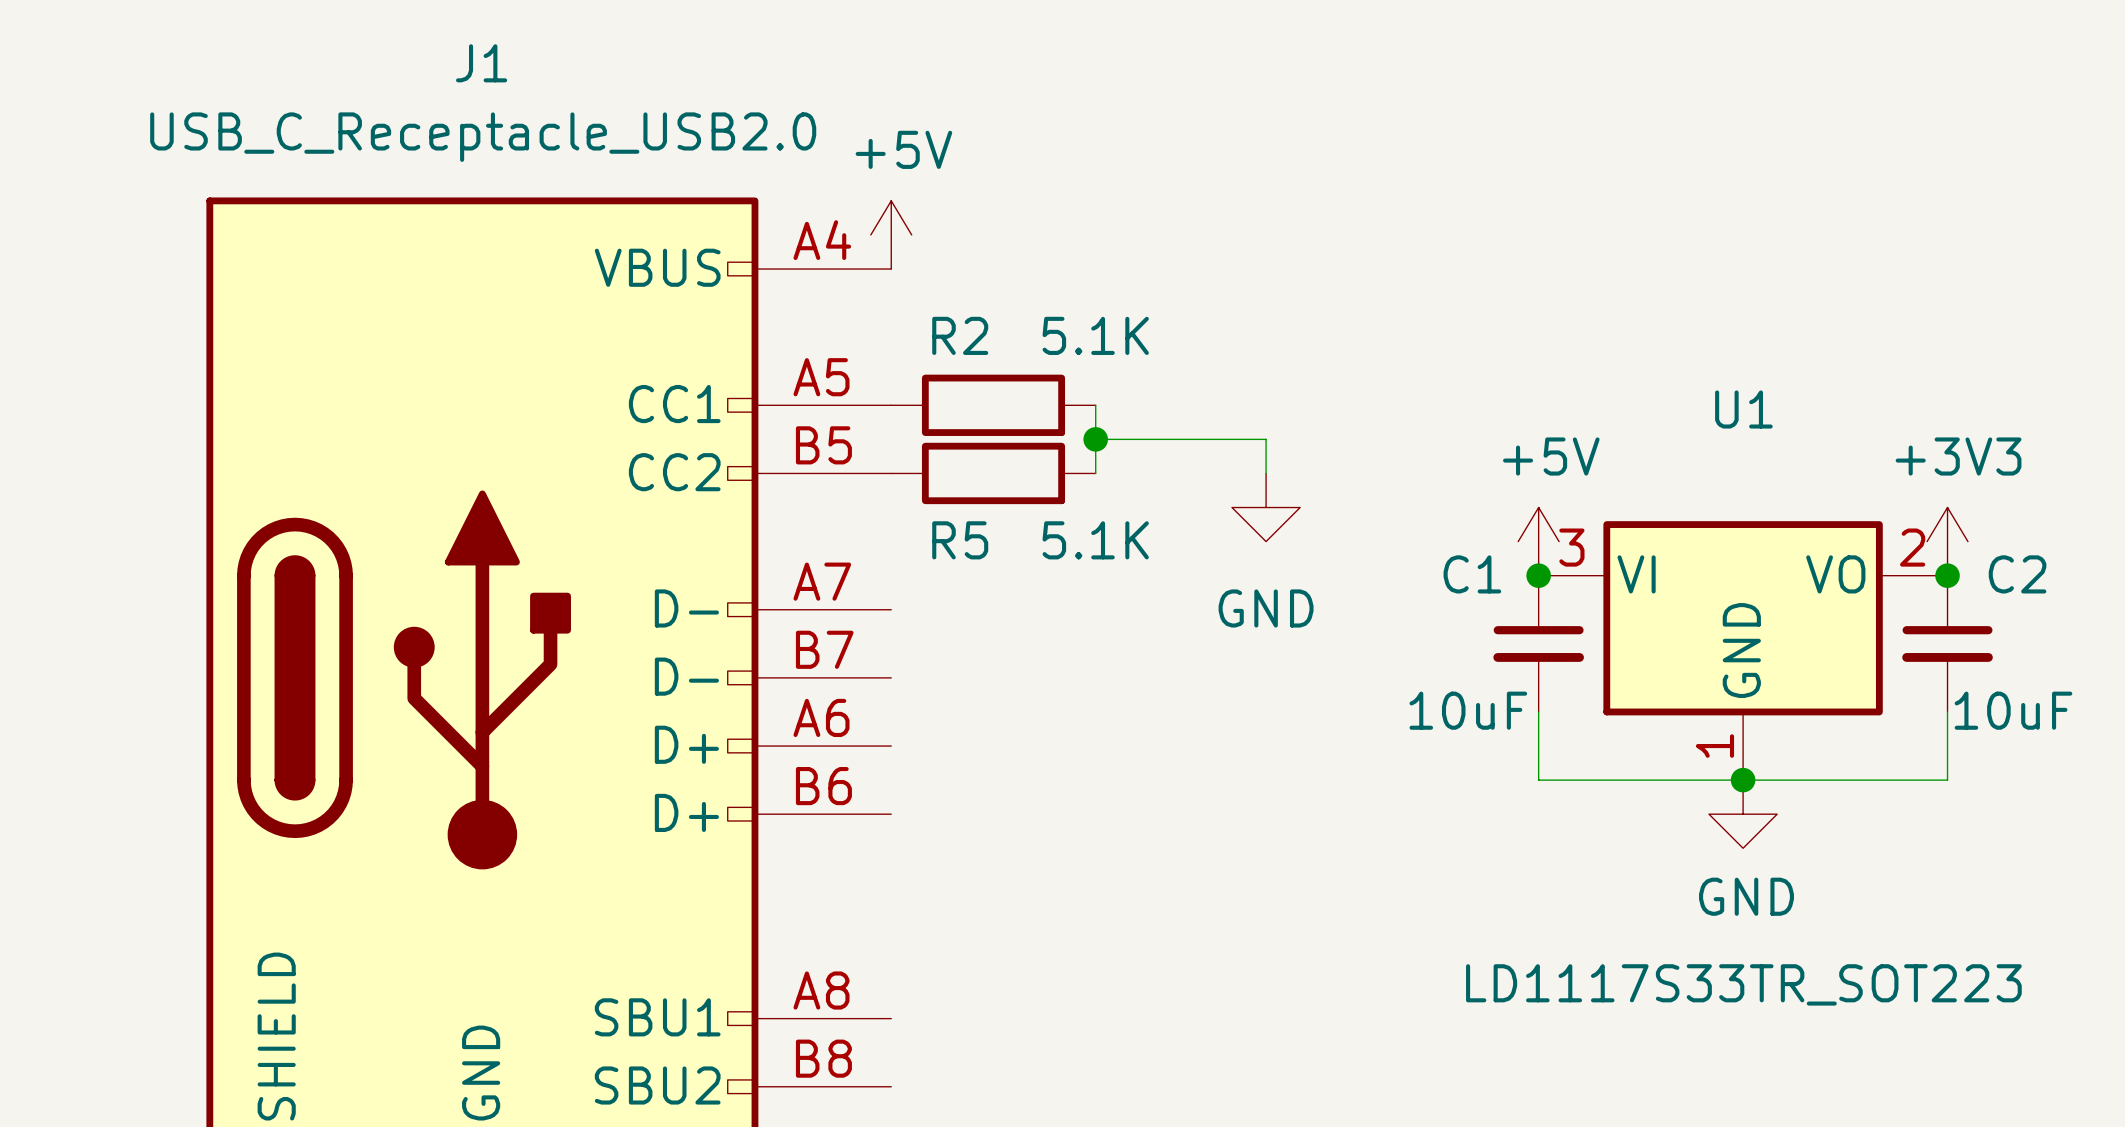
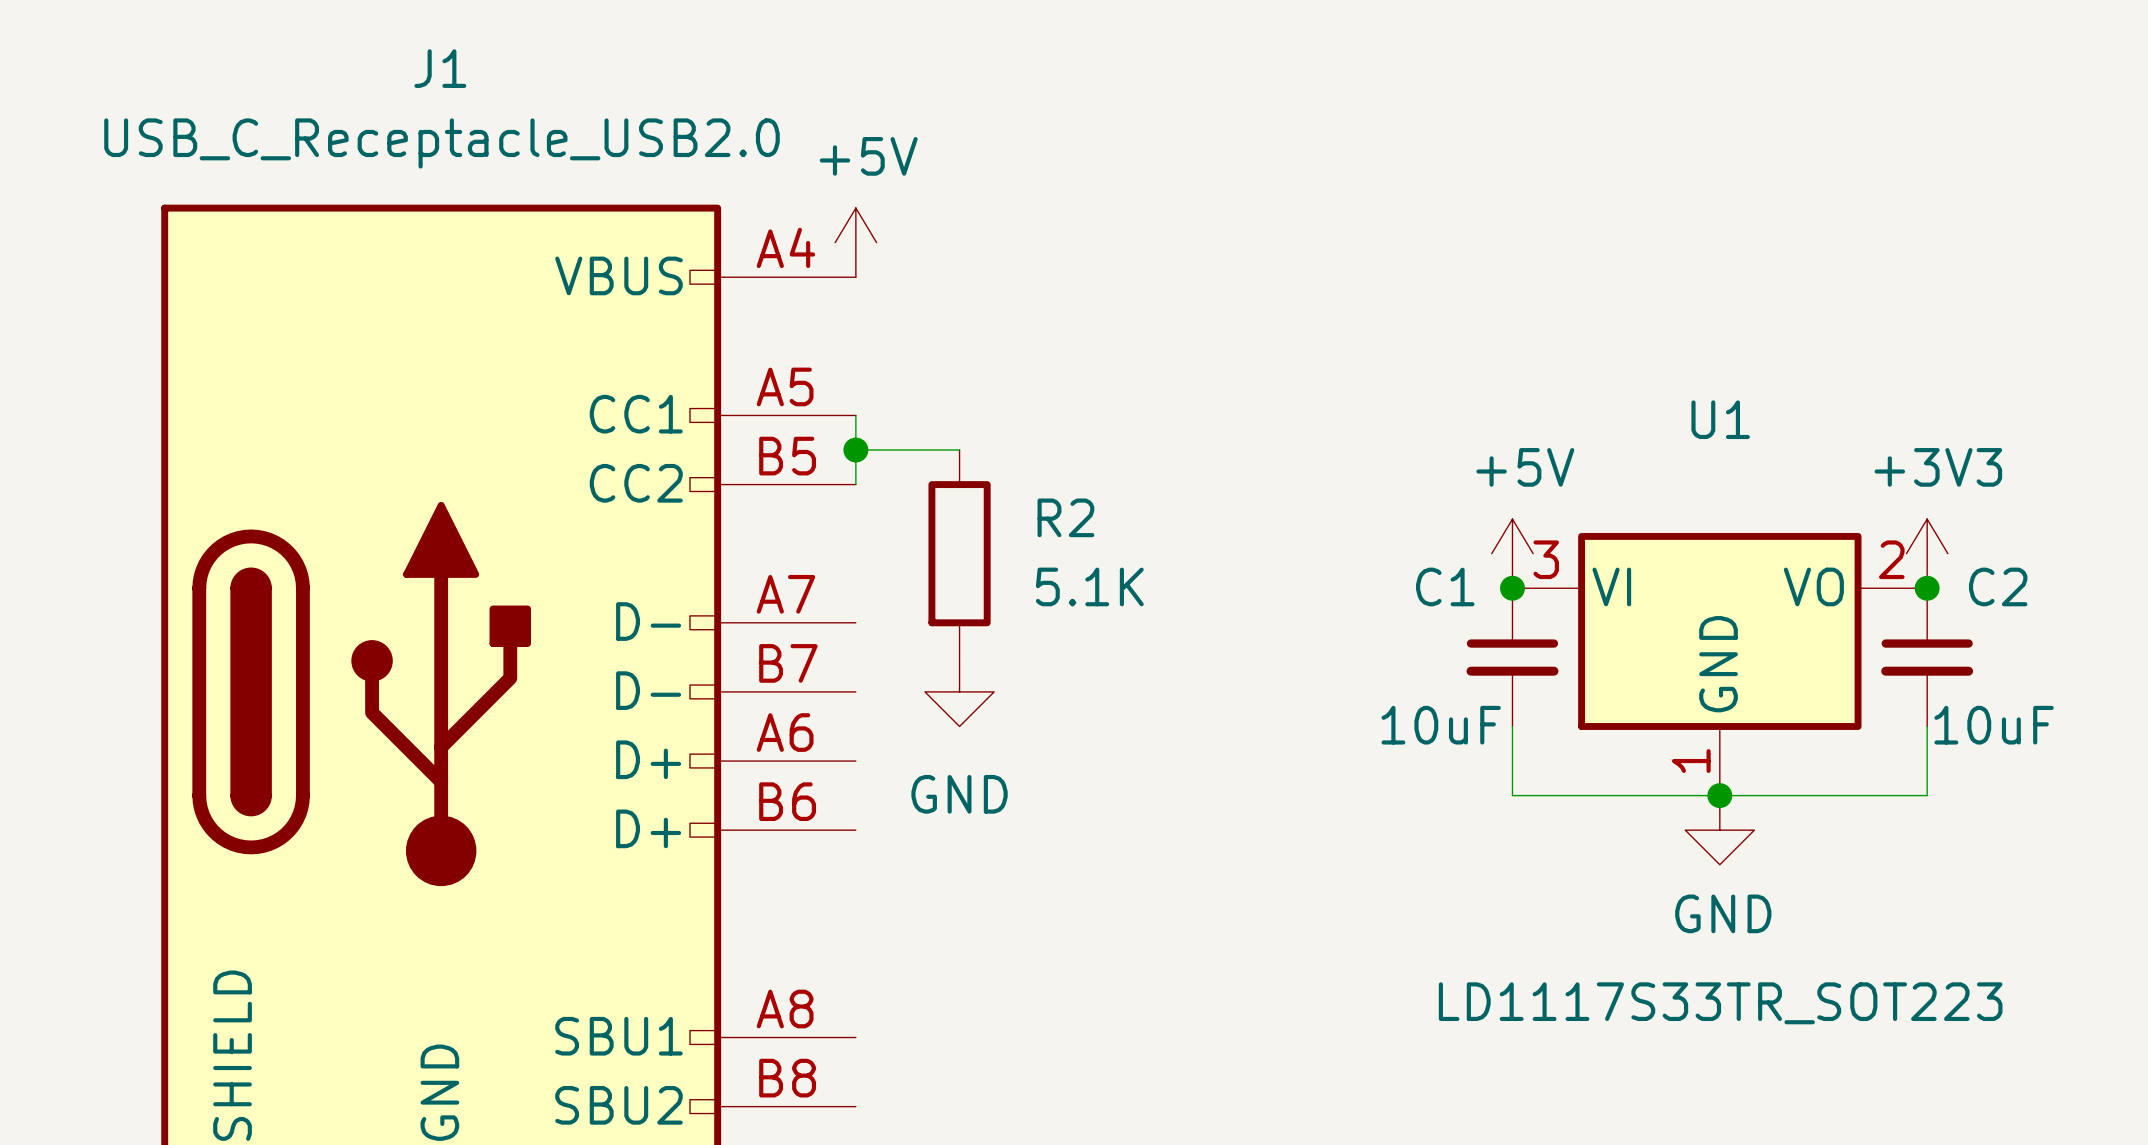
R2 value position: 5.1K (1095, 335) -> 5.1K (1089, 586)
R2 rotation: 0° (993, 405) -> 90° clockwise (959, 553)
R2 position: (993, 405) -> (959, 553)
wire: (1095, 405) (1095, 473) -> (855, 415) (855, 484)
wire: none -> (855, 450) (959, 450)
junction: none -> (855, 450)
wire: (1095, 439) (1266, 439) (1266, 473) -> none
junction: (1095, 439) -> none
R5: 5.1K (993, 473) -> none
power symbol position: GND (1266, 507) -> GND (959, 691)

